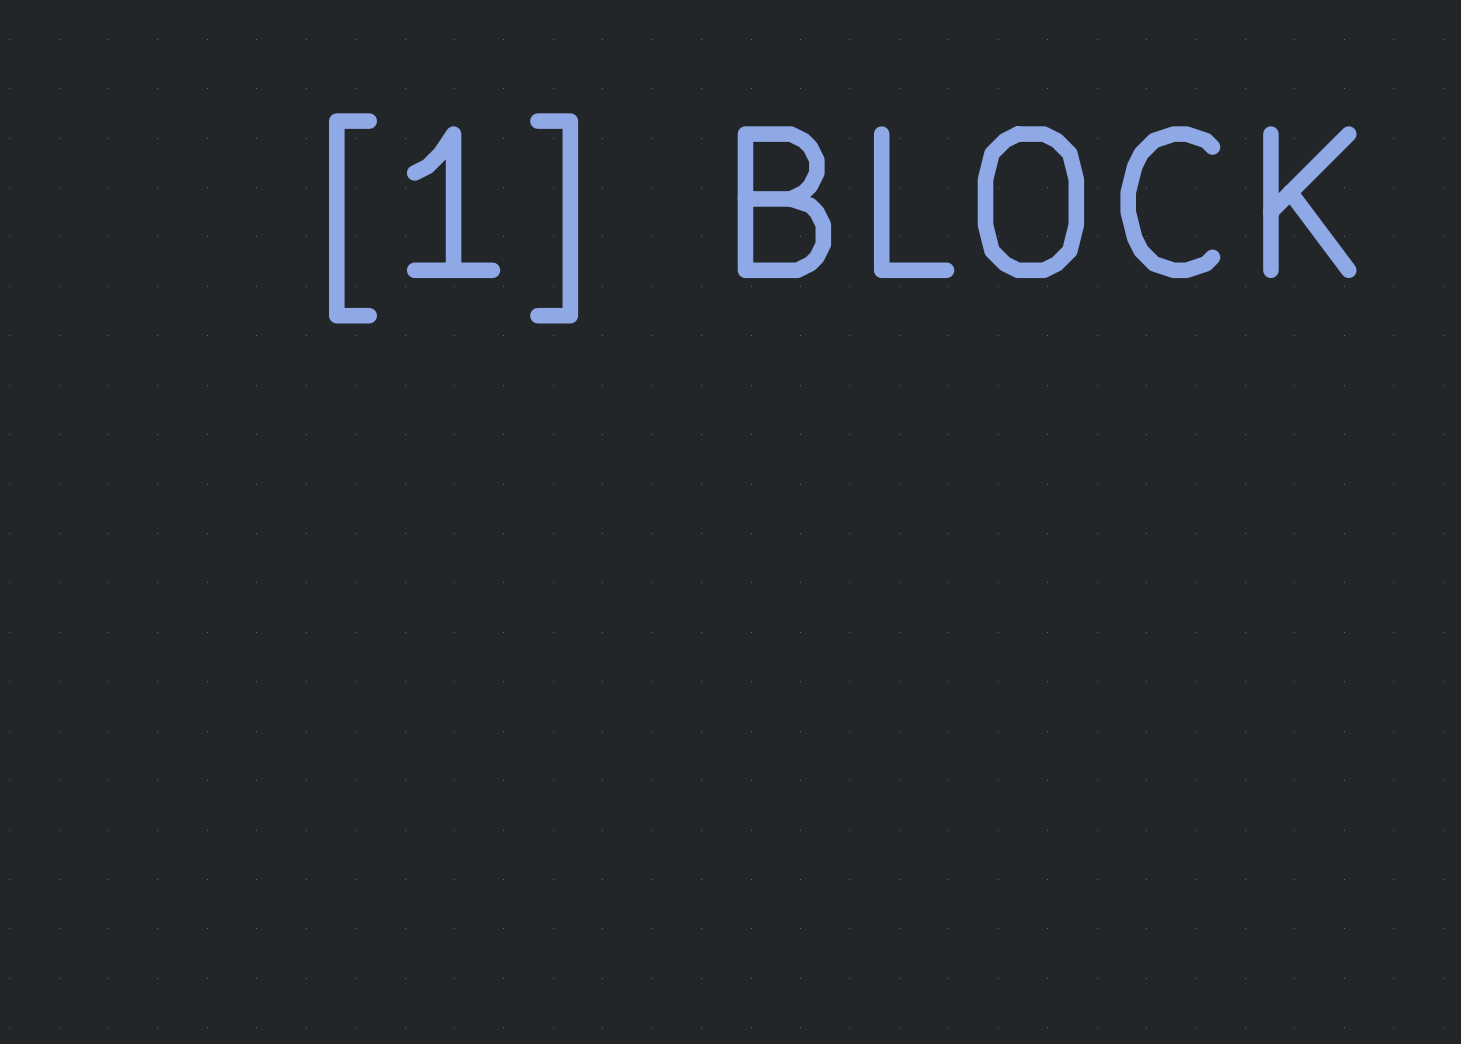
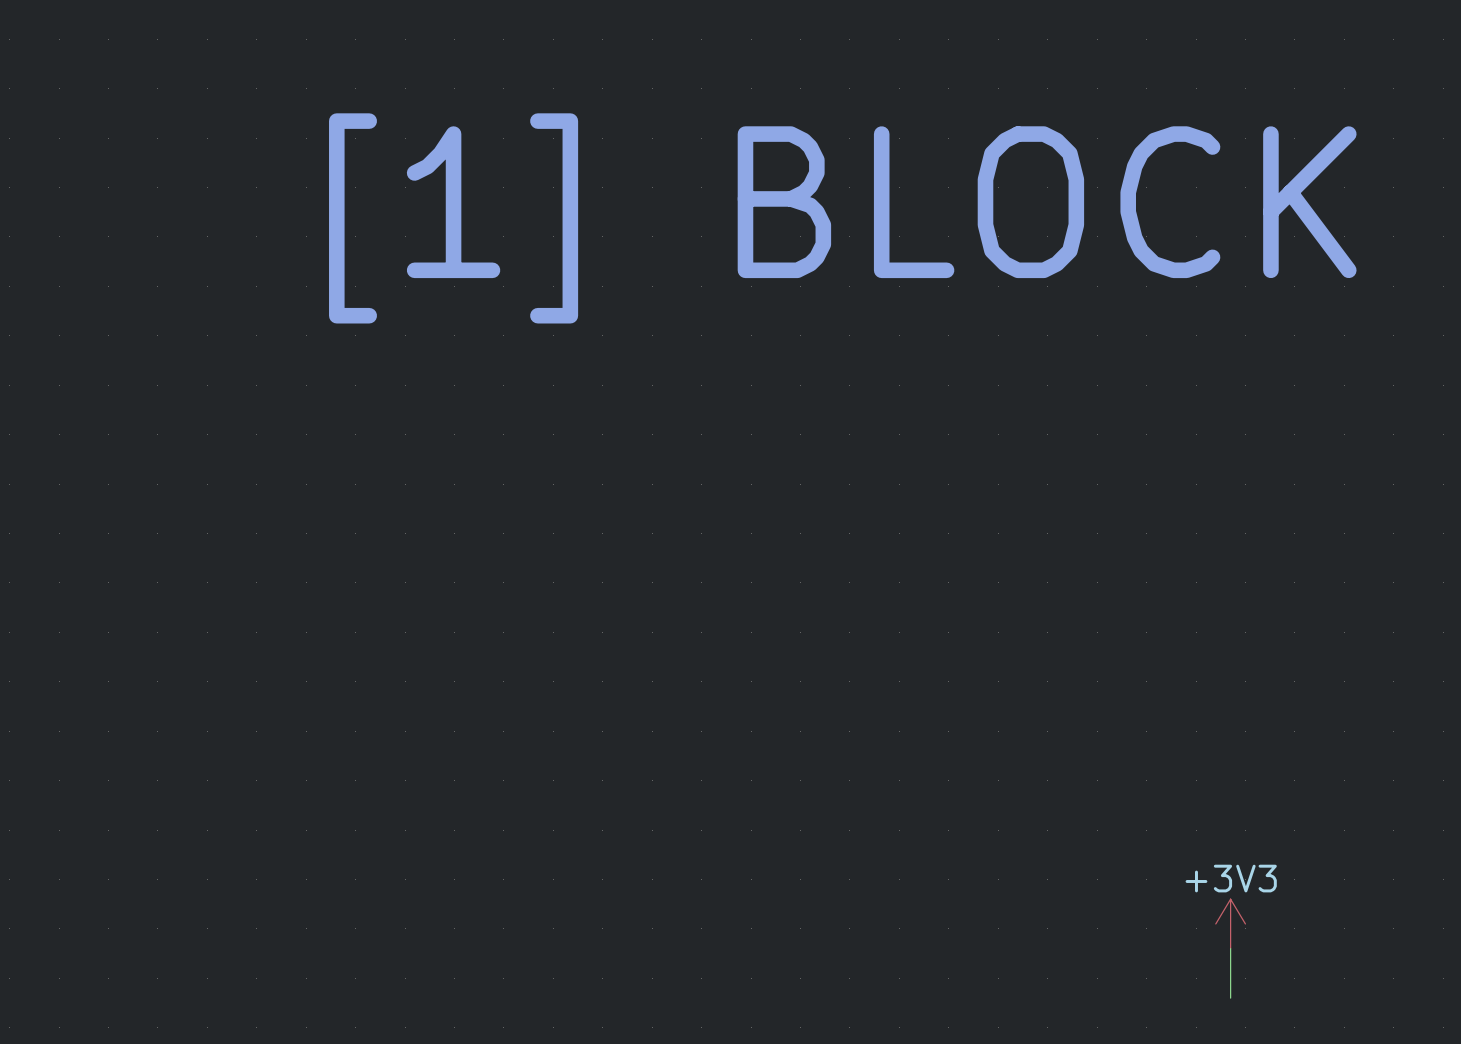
power symbol: none -> +3V3 (1230, 923)
wire: none -> (1230, 948) (1230, 998)

